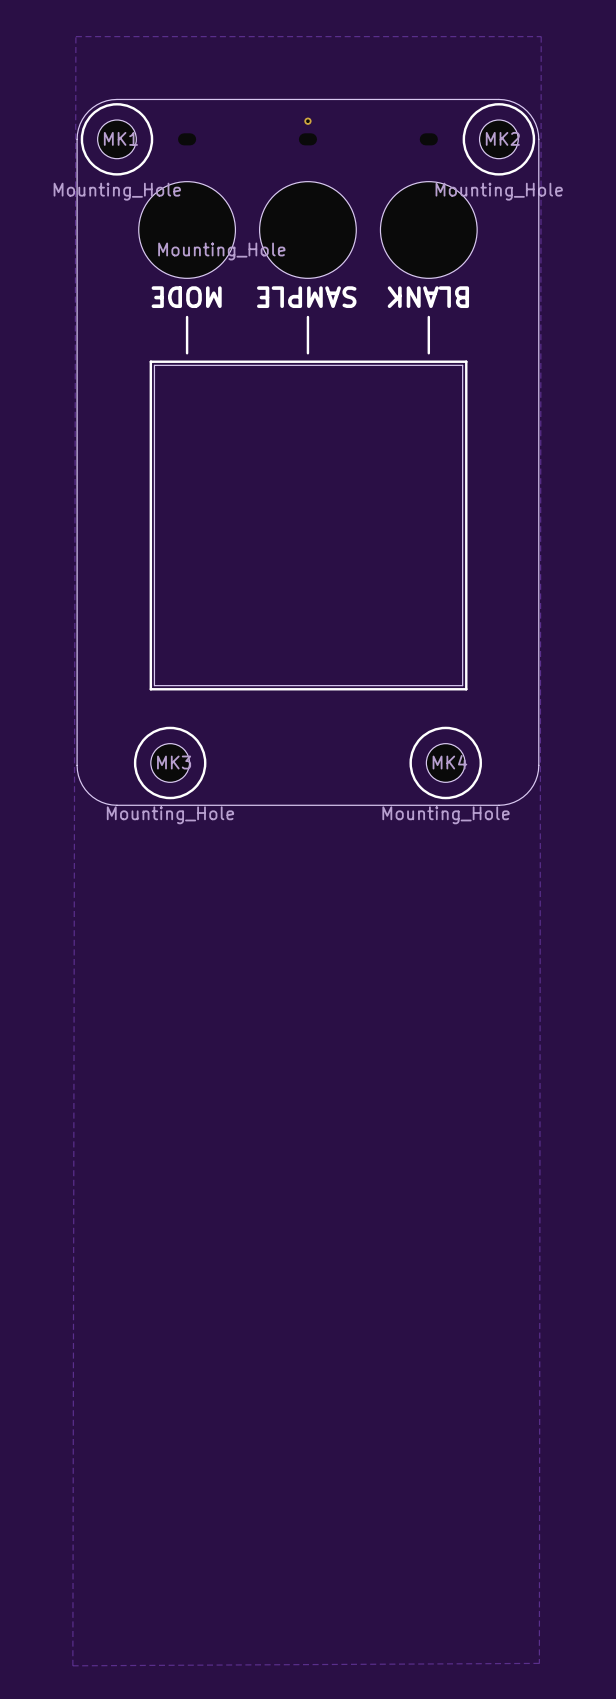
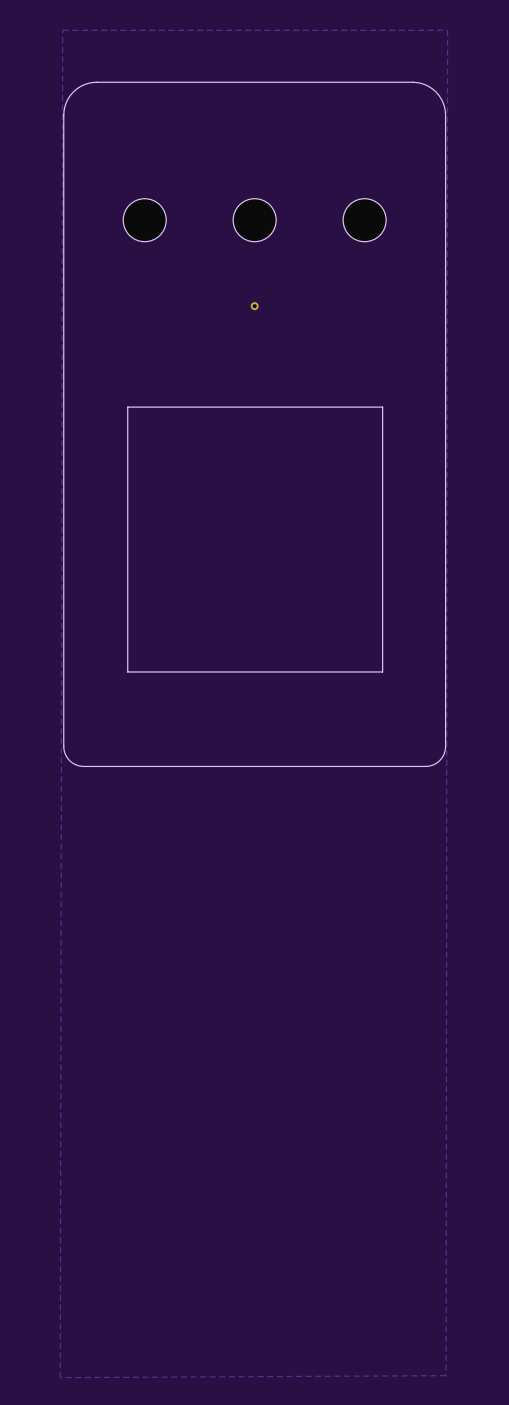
drawing: [80, 103, 154, 176] -> none
drawing: [462, 103, 536, 176] -> none
via: (307, 121) -> none
MK1: Mounting_Hole (116, 139) -> none
part: Mounting_Hole (307, 139) -> none
MK2: Mounting_Hole (498, 139) -> none
part: (187, 229) -> none
part: (307, 229) -> none
part: (428, 229) -> none
part: none -> (144, 220)
part: none -> (254, 220)
part: none -> (364, 220)
text: MODE (186, 297) -> none
text: SAMPLE (306, 297) -> none
text: BLANK (428, 297) -> none
line: (187, 317) (187, 353) -> none
line: (307, 317) (307, 353) -> none
line: (428, 317) (428, 353) -> none
line: (150, 361) (150, 689) (466, 689) (466, 361) (150, 361) -> none
via: none -> (254, 306)
drawing position: (308, 525) -> (255, 539)
drawing: [133, 726, 207, 800] -> none
drawing: [409, 726, 482, 800] -> none
MK3: Mounting_Hole (170, 762) -> none
MK4: Mounting_Hole (445, 762) -> none
board edge: (77, 765) (80, 780) (88, 793) (101, 802) (116, 805) (504, 804) (518, 799) (530, 789) (535, 780) (538, 765) -> (63, 633) (63, 749) (69, 760) (76, 764) (83, 766) (433, 764) (441, 758) (445, 749) (445, 633)

